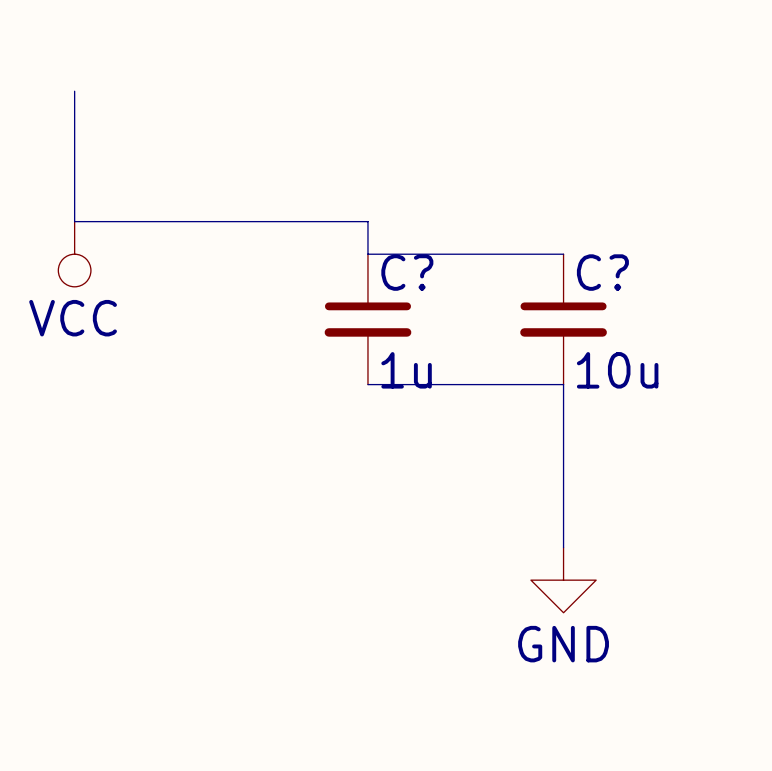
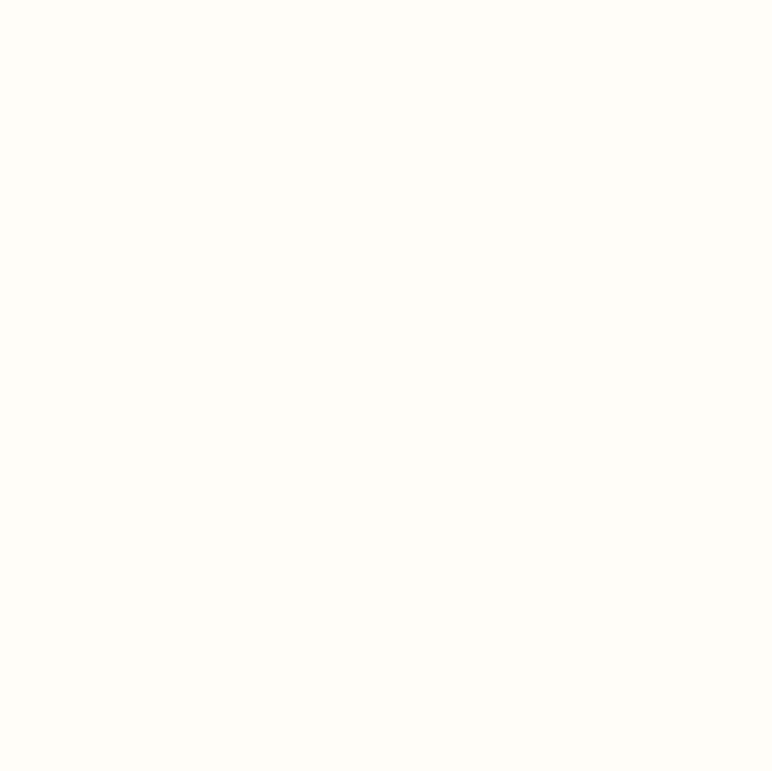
wire: (74, 91) (74, 221) (367, 221) (367, 254) (563, 254) -> none
power symbol: VCC (74, 254) -> none
C?: 1u (367, 319) -> none
C?: 10u (563, 319) -> none
wire: (367, 384) (563, 384) (563, 547) -> none
power symbol: GND (563, 580) -> none

